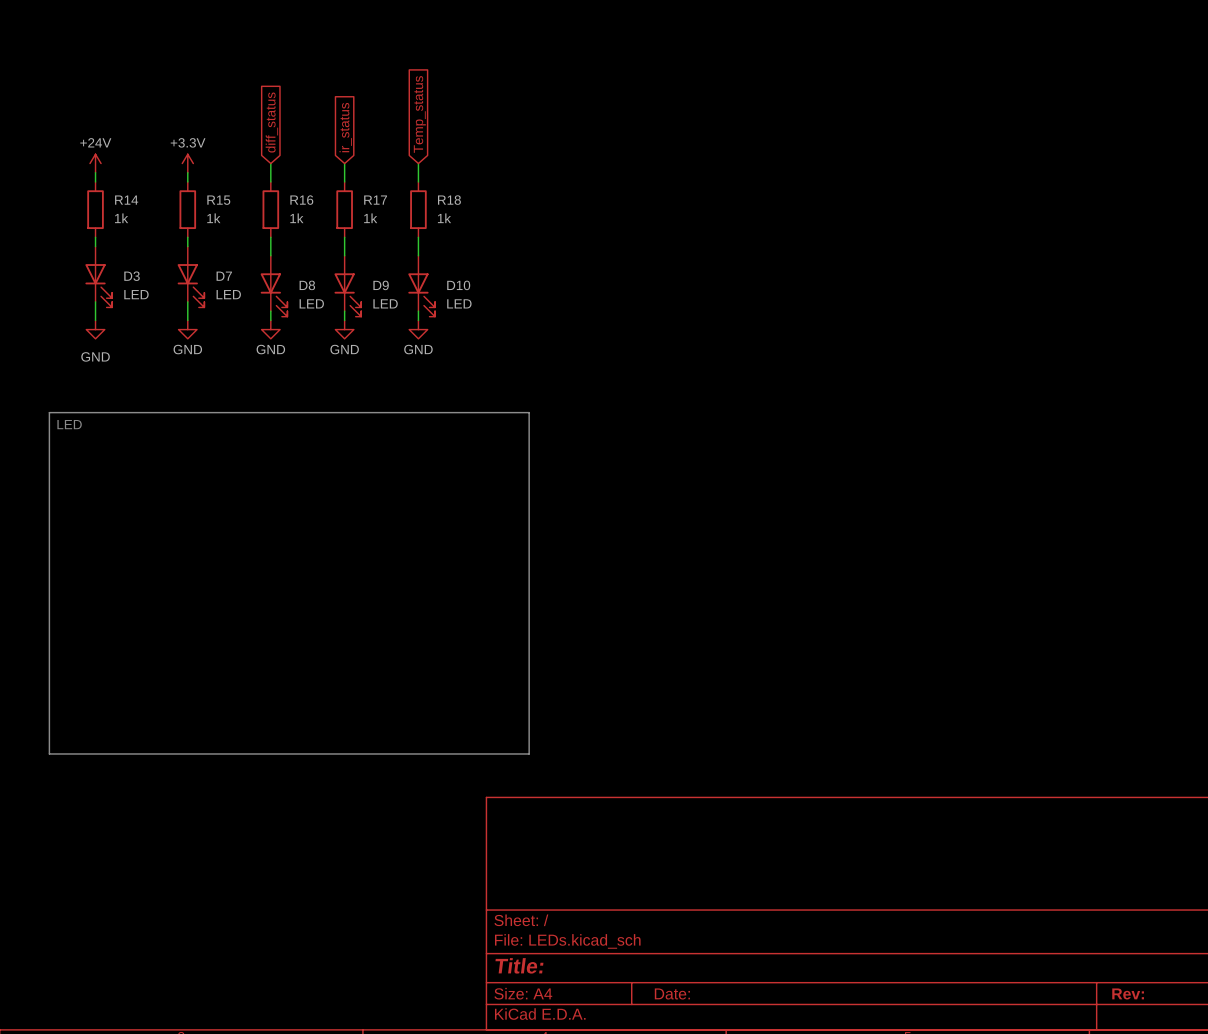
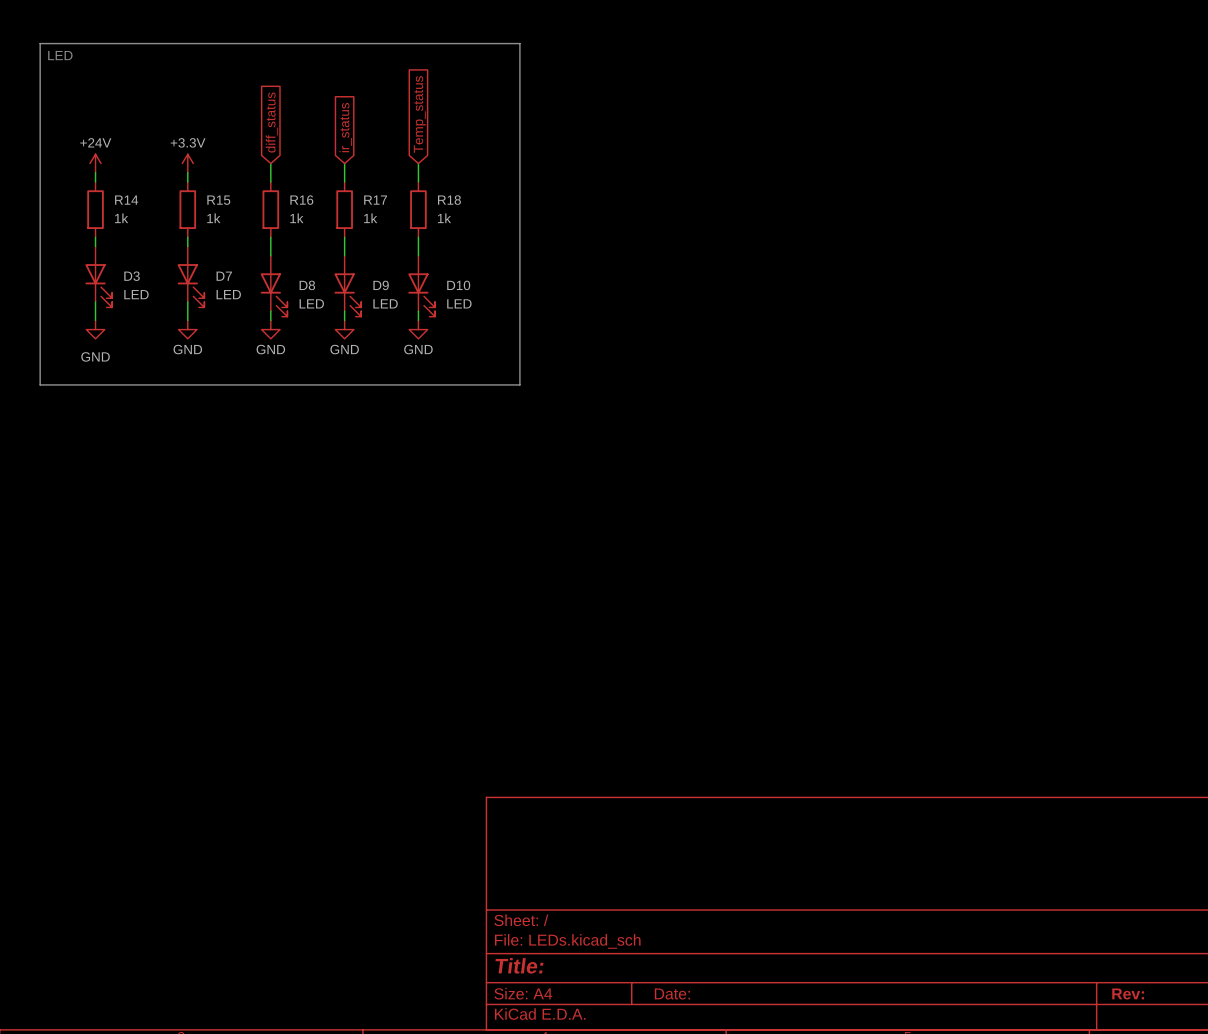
line: none -> (40, 43) (519, 43) (519, 384) (40, 384) (40, 43)
text: none -> LED (60, 55)
line: (49, 412) (529, 412) (529, 753) (49, 753) (49, 412) -> none
text: LED (69, 424) -> none

